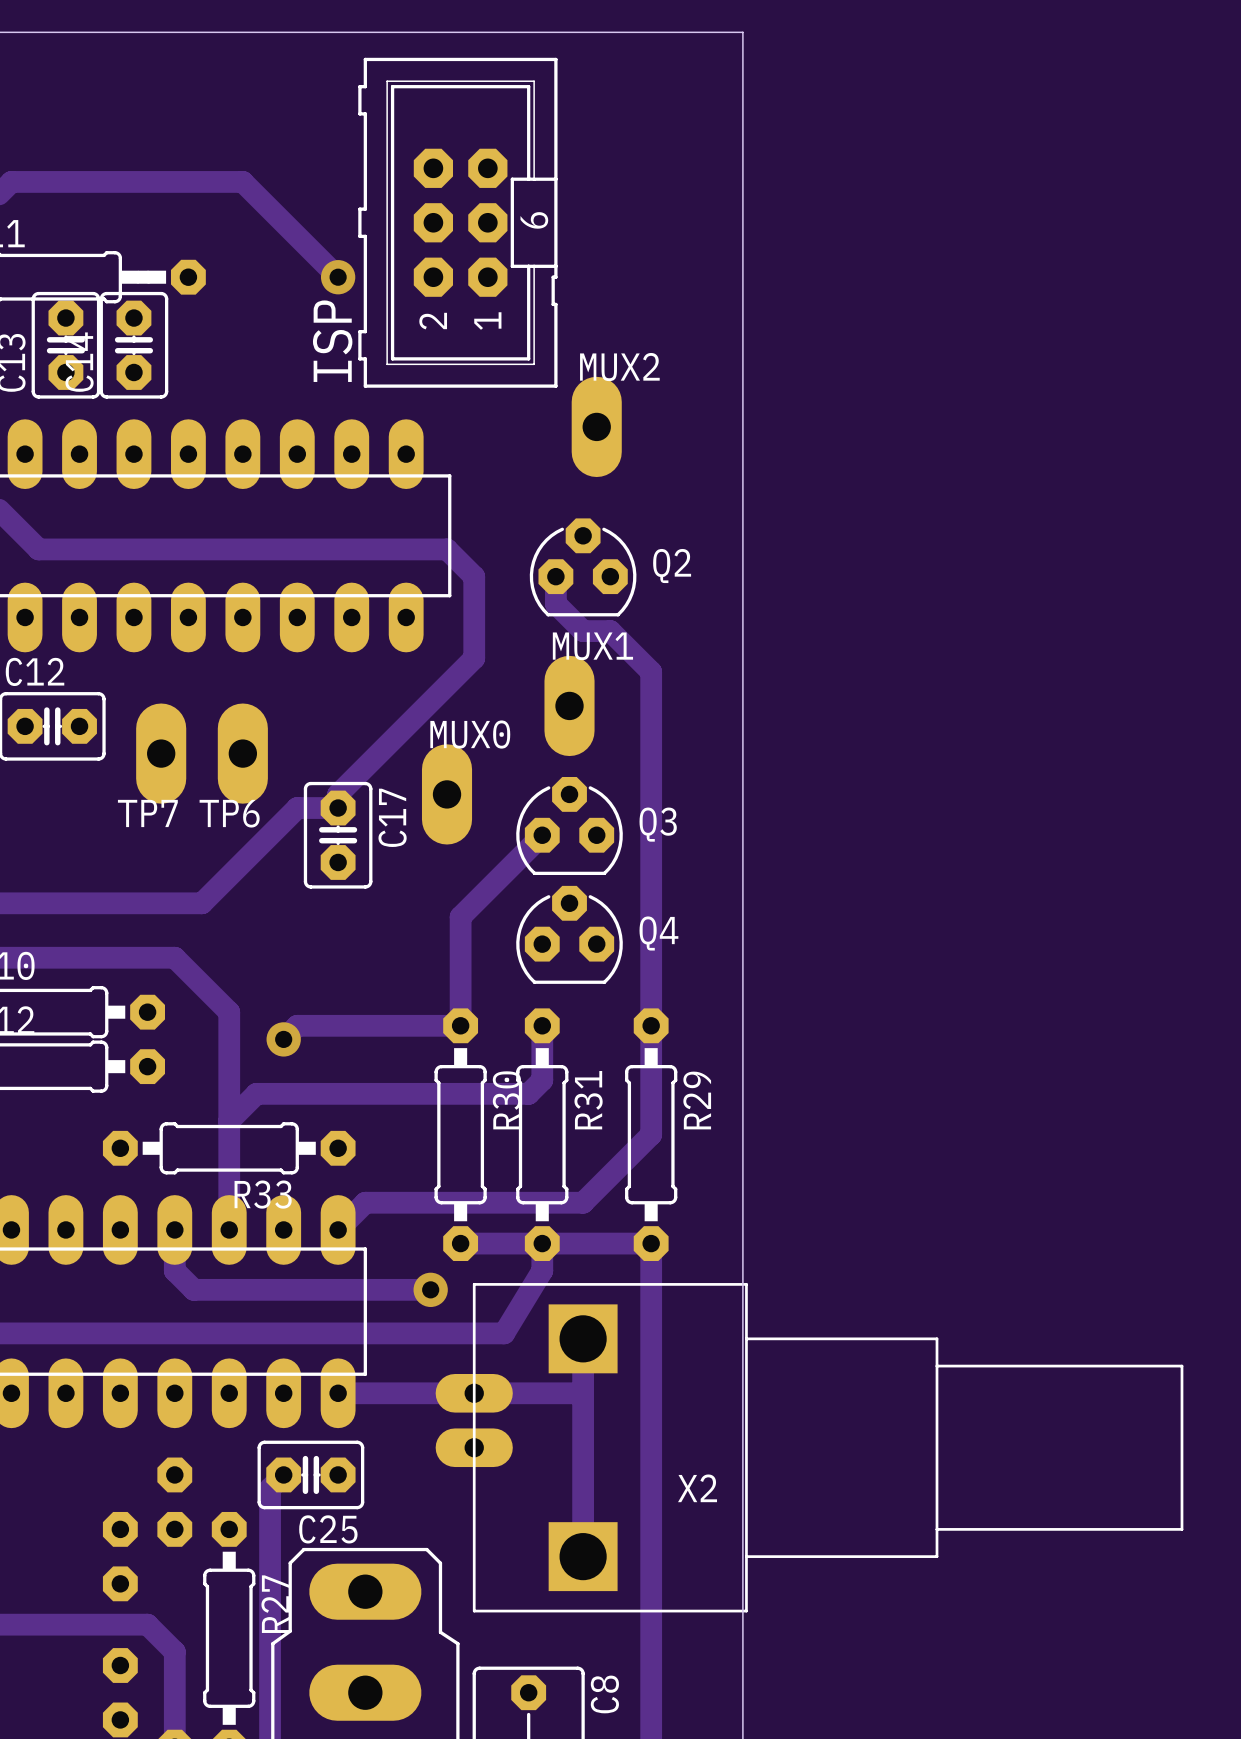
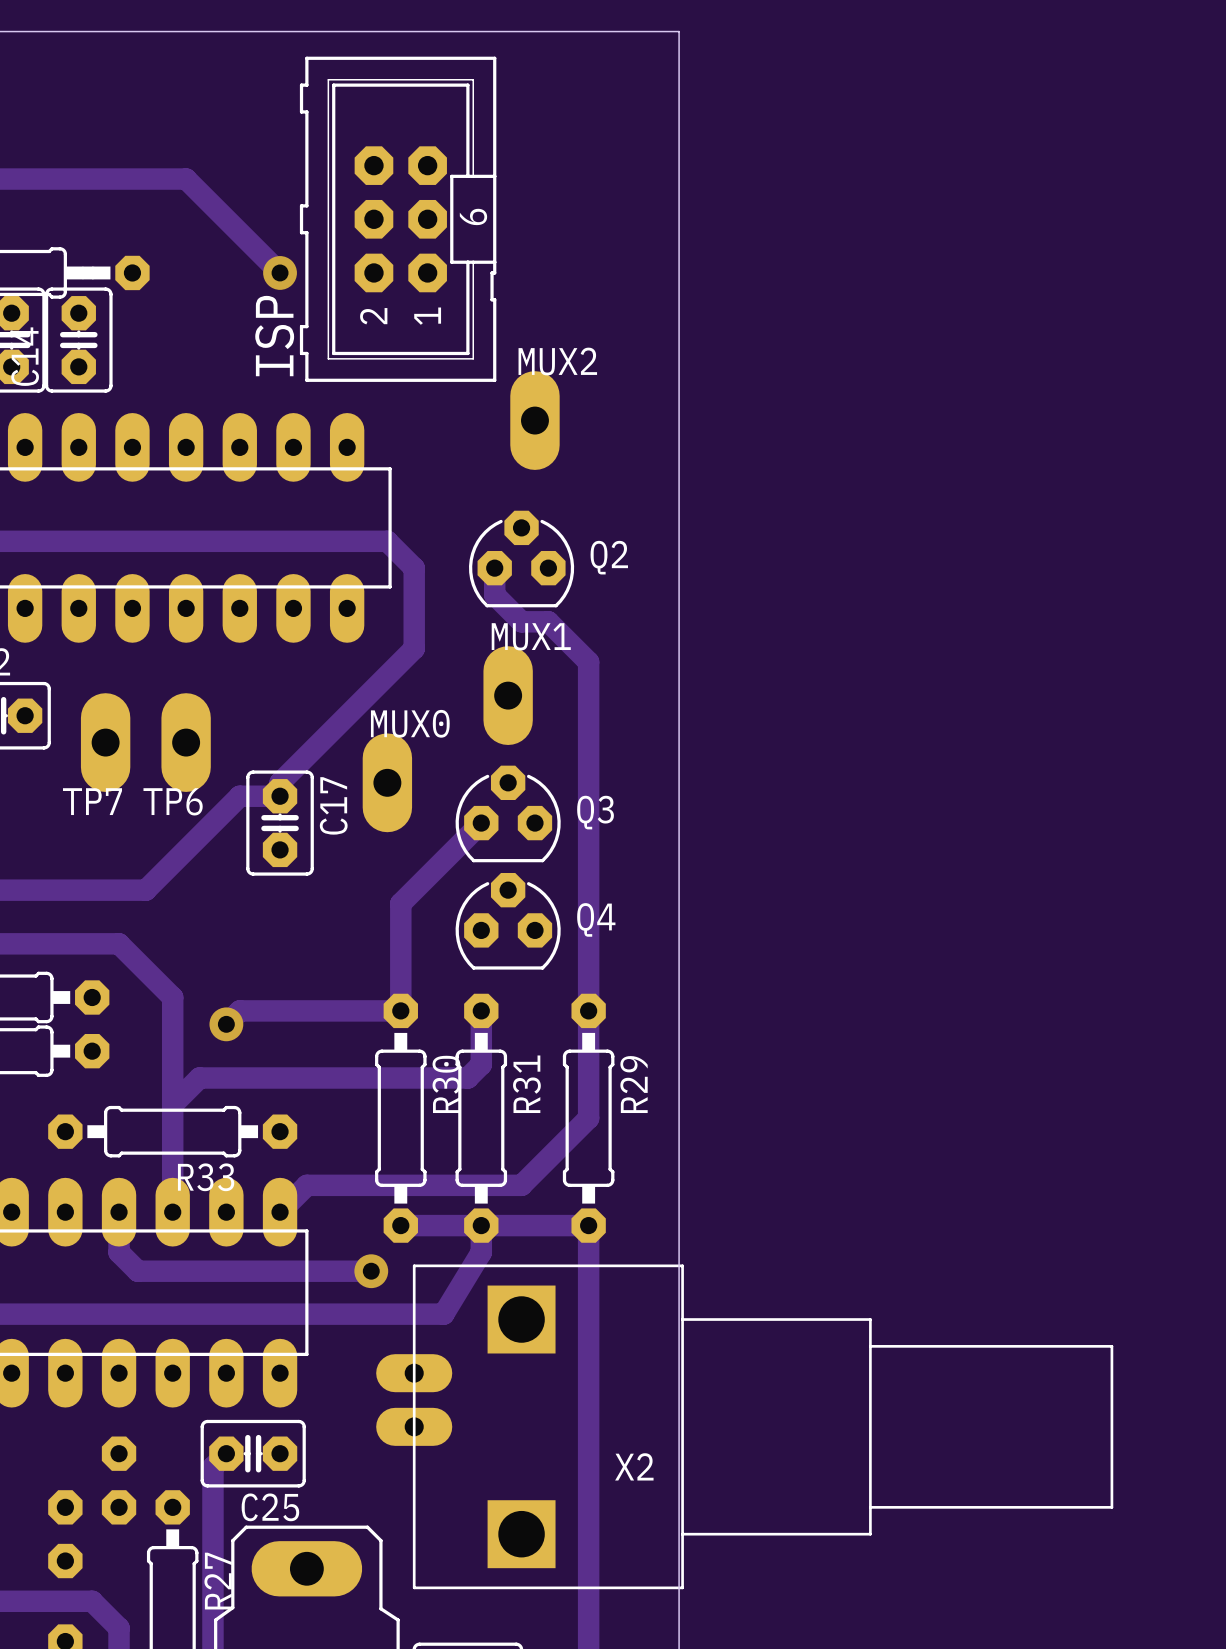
track: (583, 1338) (583, 1556) -> none
track: (338, 1393) (583, 1393) -> none

